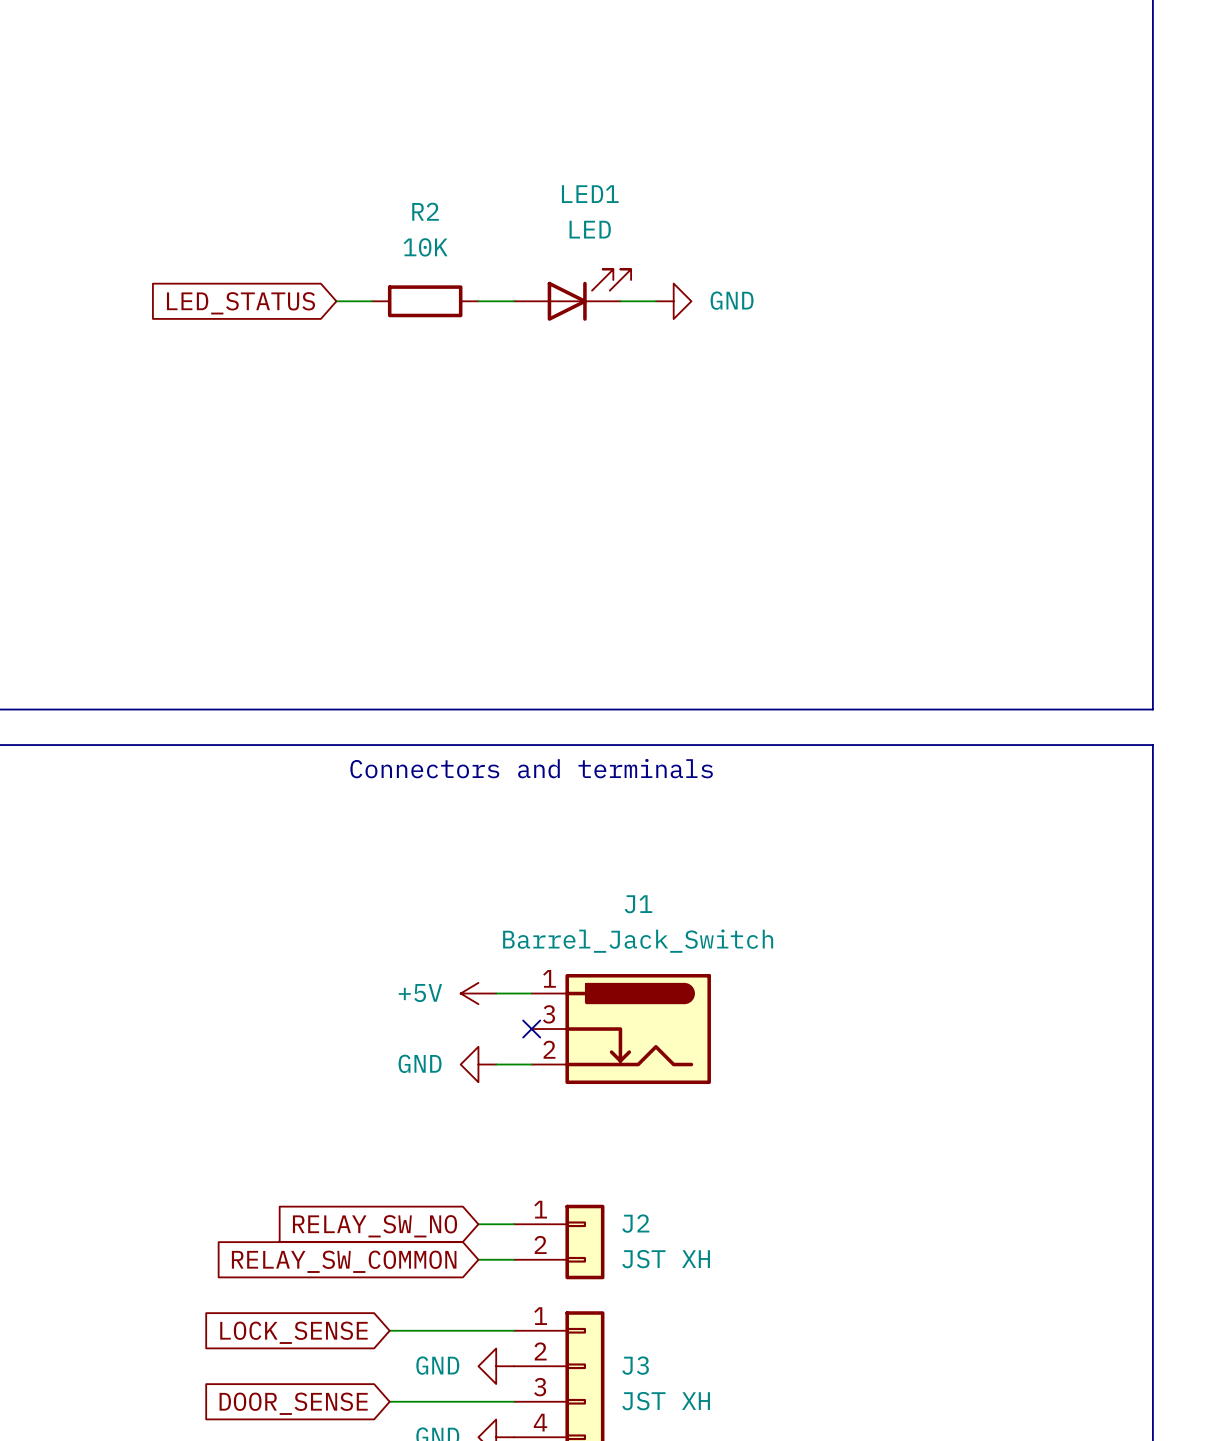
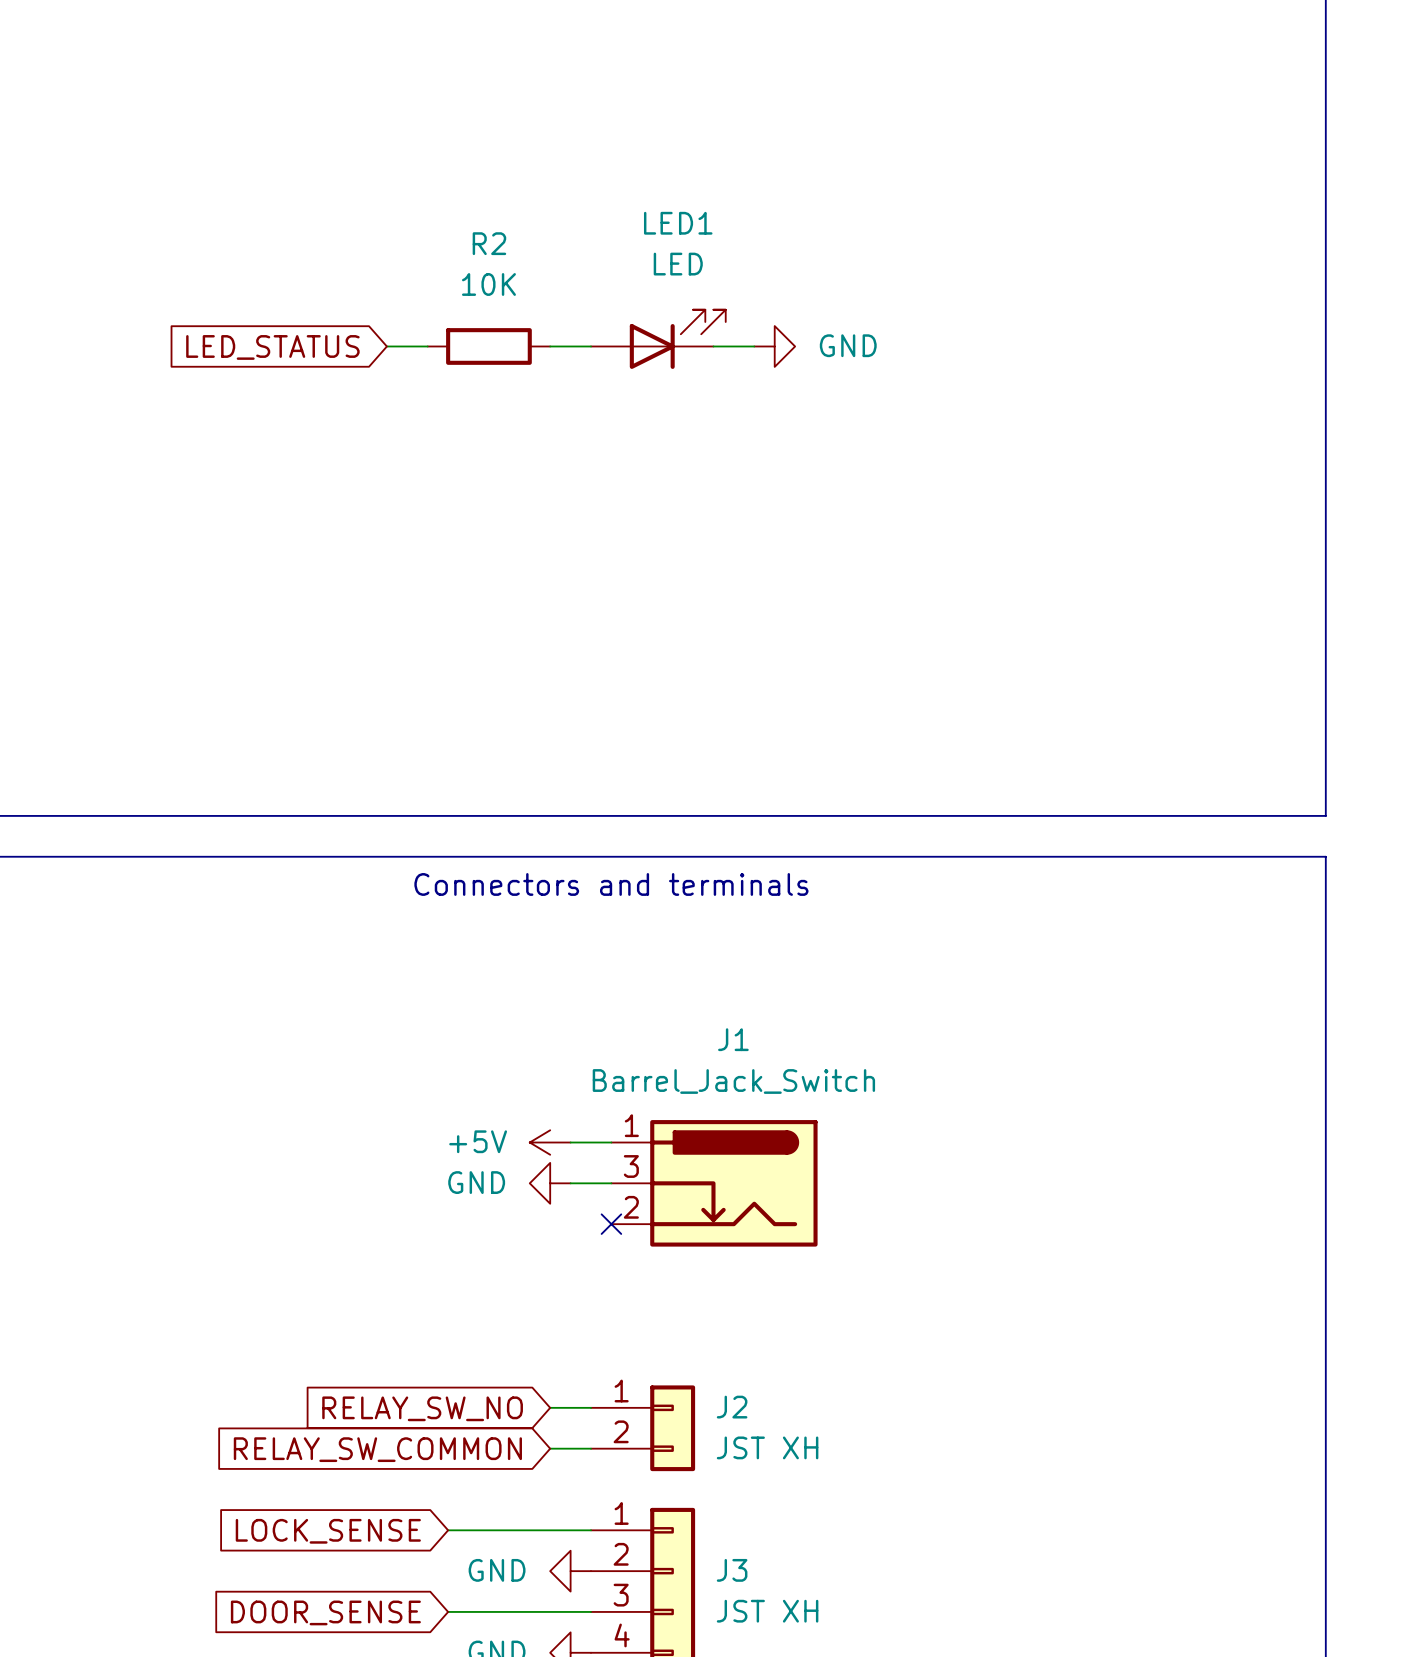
no-connect mark position: (531, 1029) -> (611, 1224)
power symbol position: GND (478, 1064) -> GND (550, 1183)
wire: (496, 1064) (531, 1064) -> (570, 1183) (611, 1183)

